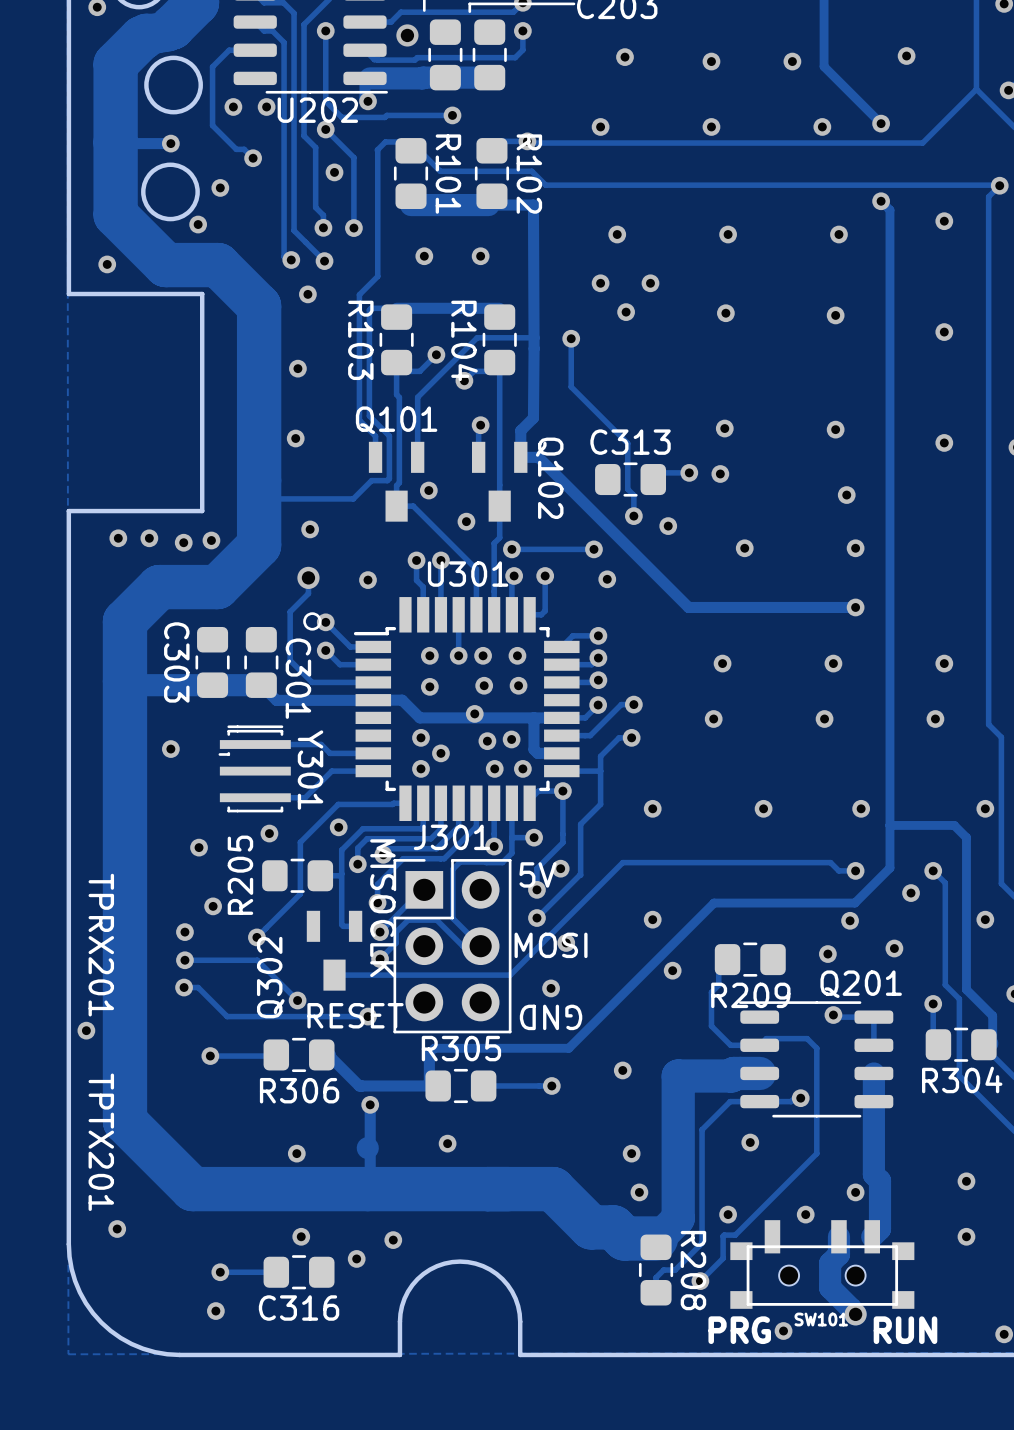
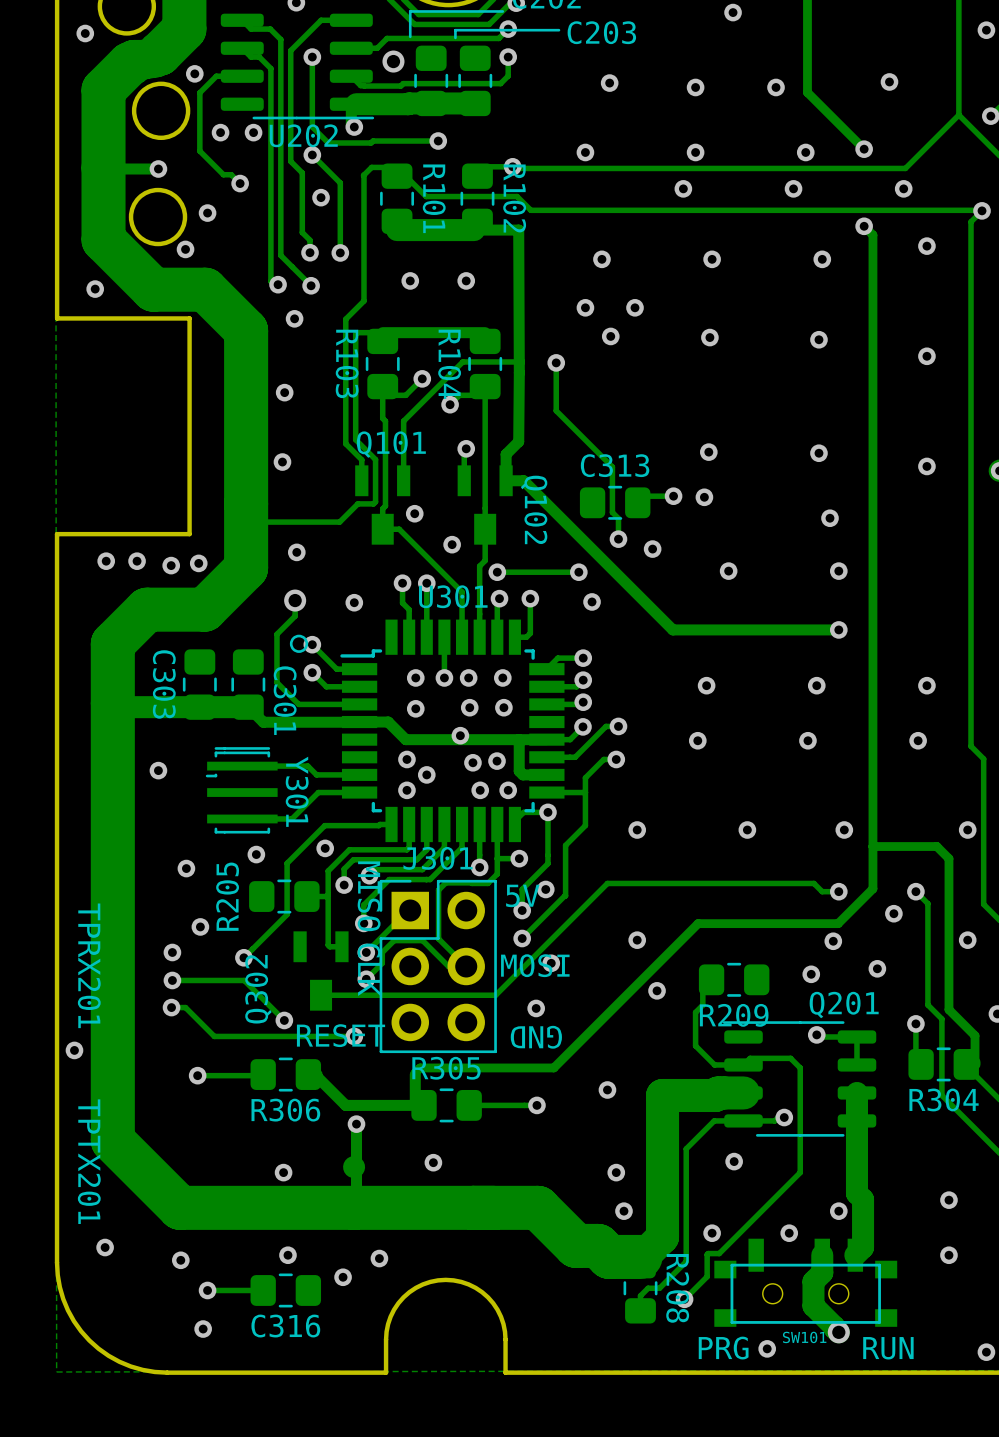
via: none -> (194, 73)
via: none -> (683, 188)
via: none -> (793, 188)
via: none -> (903, 188)
via: none -> (180, 1260)

